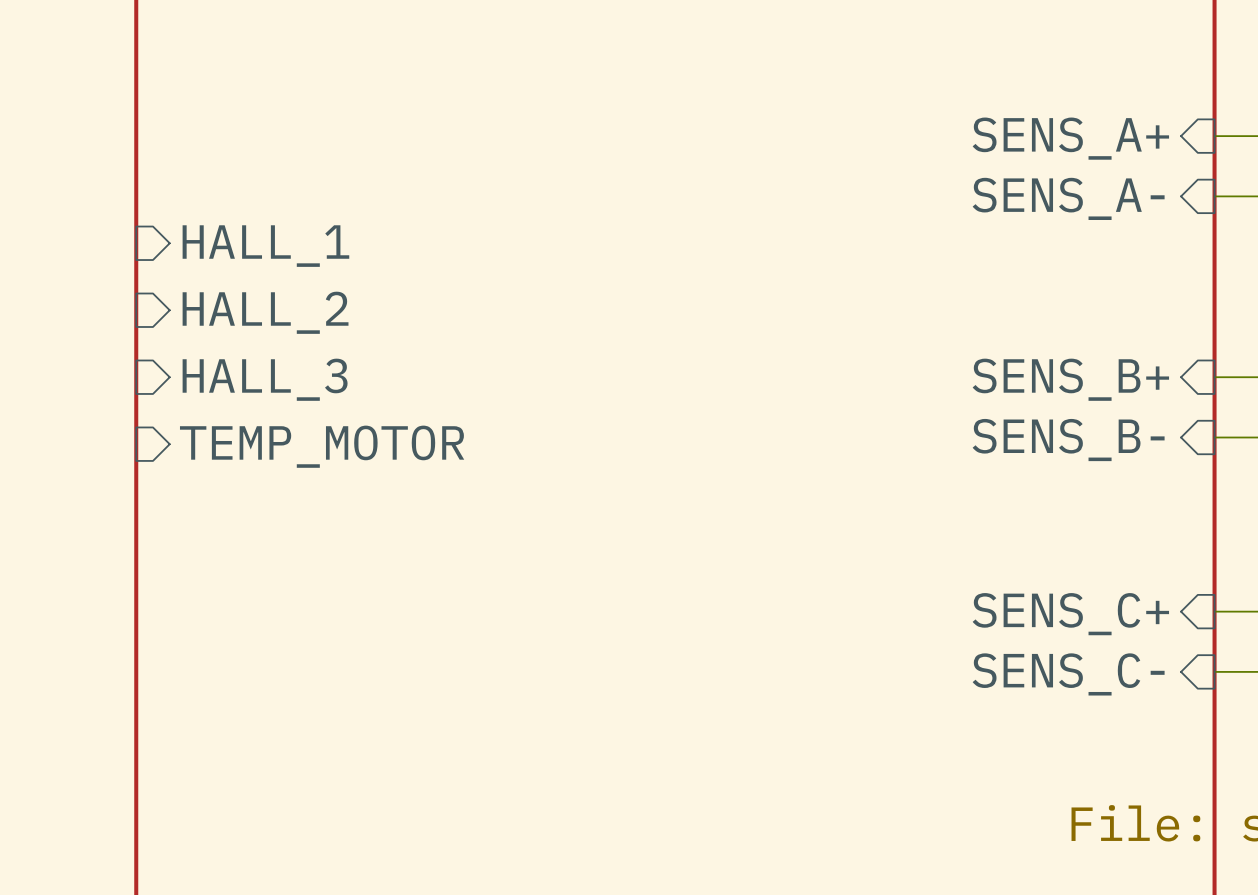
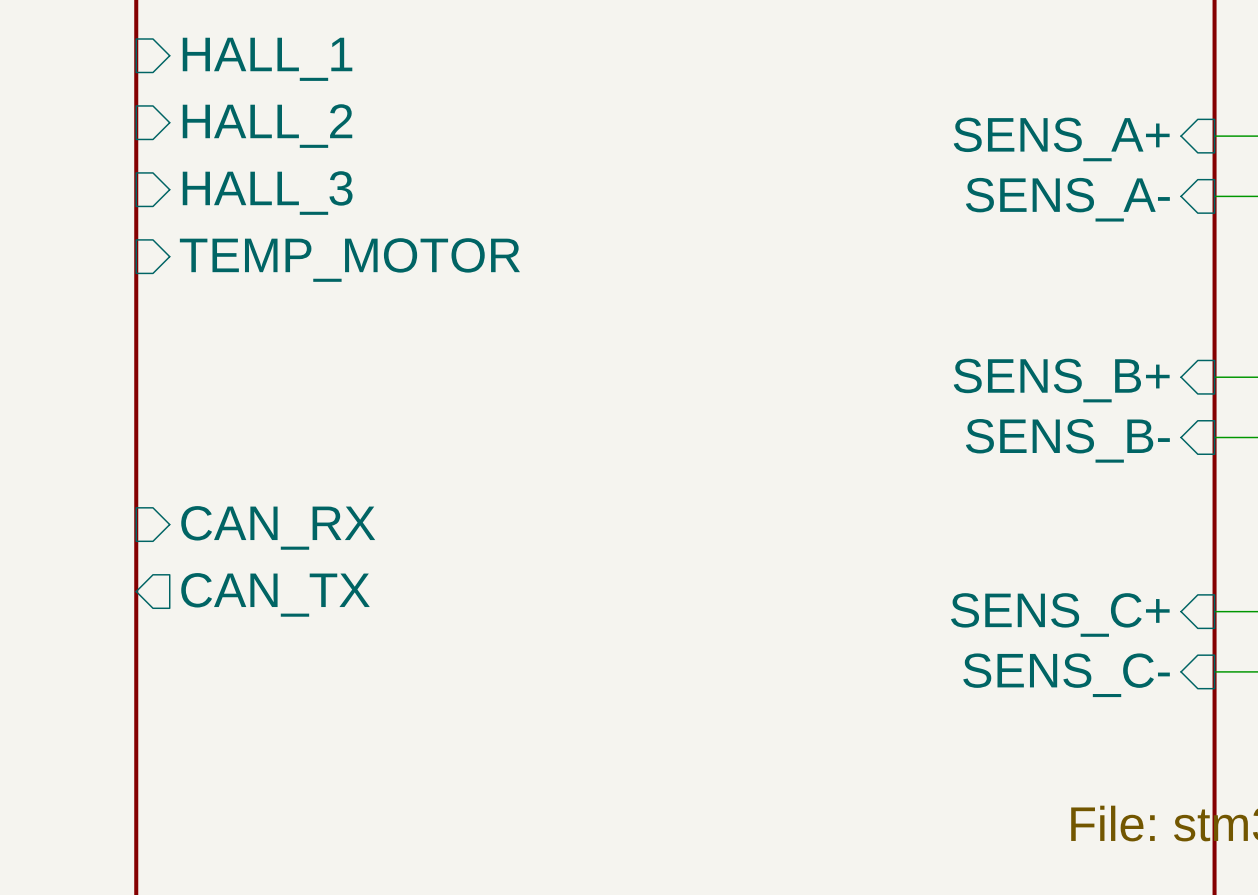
sheet pin position: HALL_1 (265, 246) -> HALL_1 (267, 59)
sheet pin position: HALL_2 (265, 312) -> HALL_2 (267, 126)
sheet pin position: HALL_3 (265, 379) -> HALL_3 (267, 193)
sheet pin position: TEMP_MOTOR (322, 446) -> TEMP_MOTOR (349, 260)
sheet pin: none -> CAN_RX (278, 527)
sheet pin: none -> CAN_TX (275, 594)

